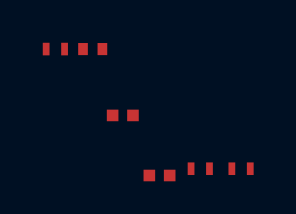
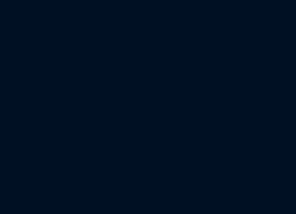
part: (55, 49) -> none
part: (92, 49) -> none
part: (122, 115) -> none
part: (200, 168) -> none
part: (241, 168) -> none
part: (159, 175) -> none

